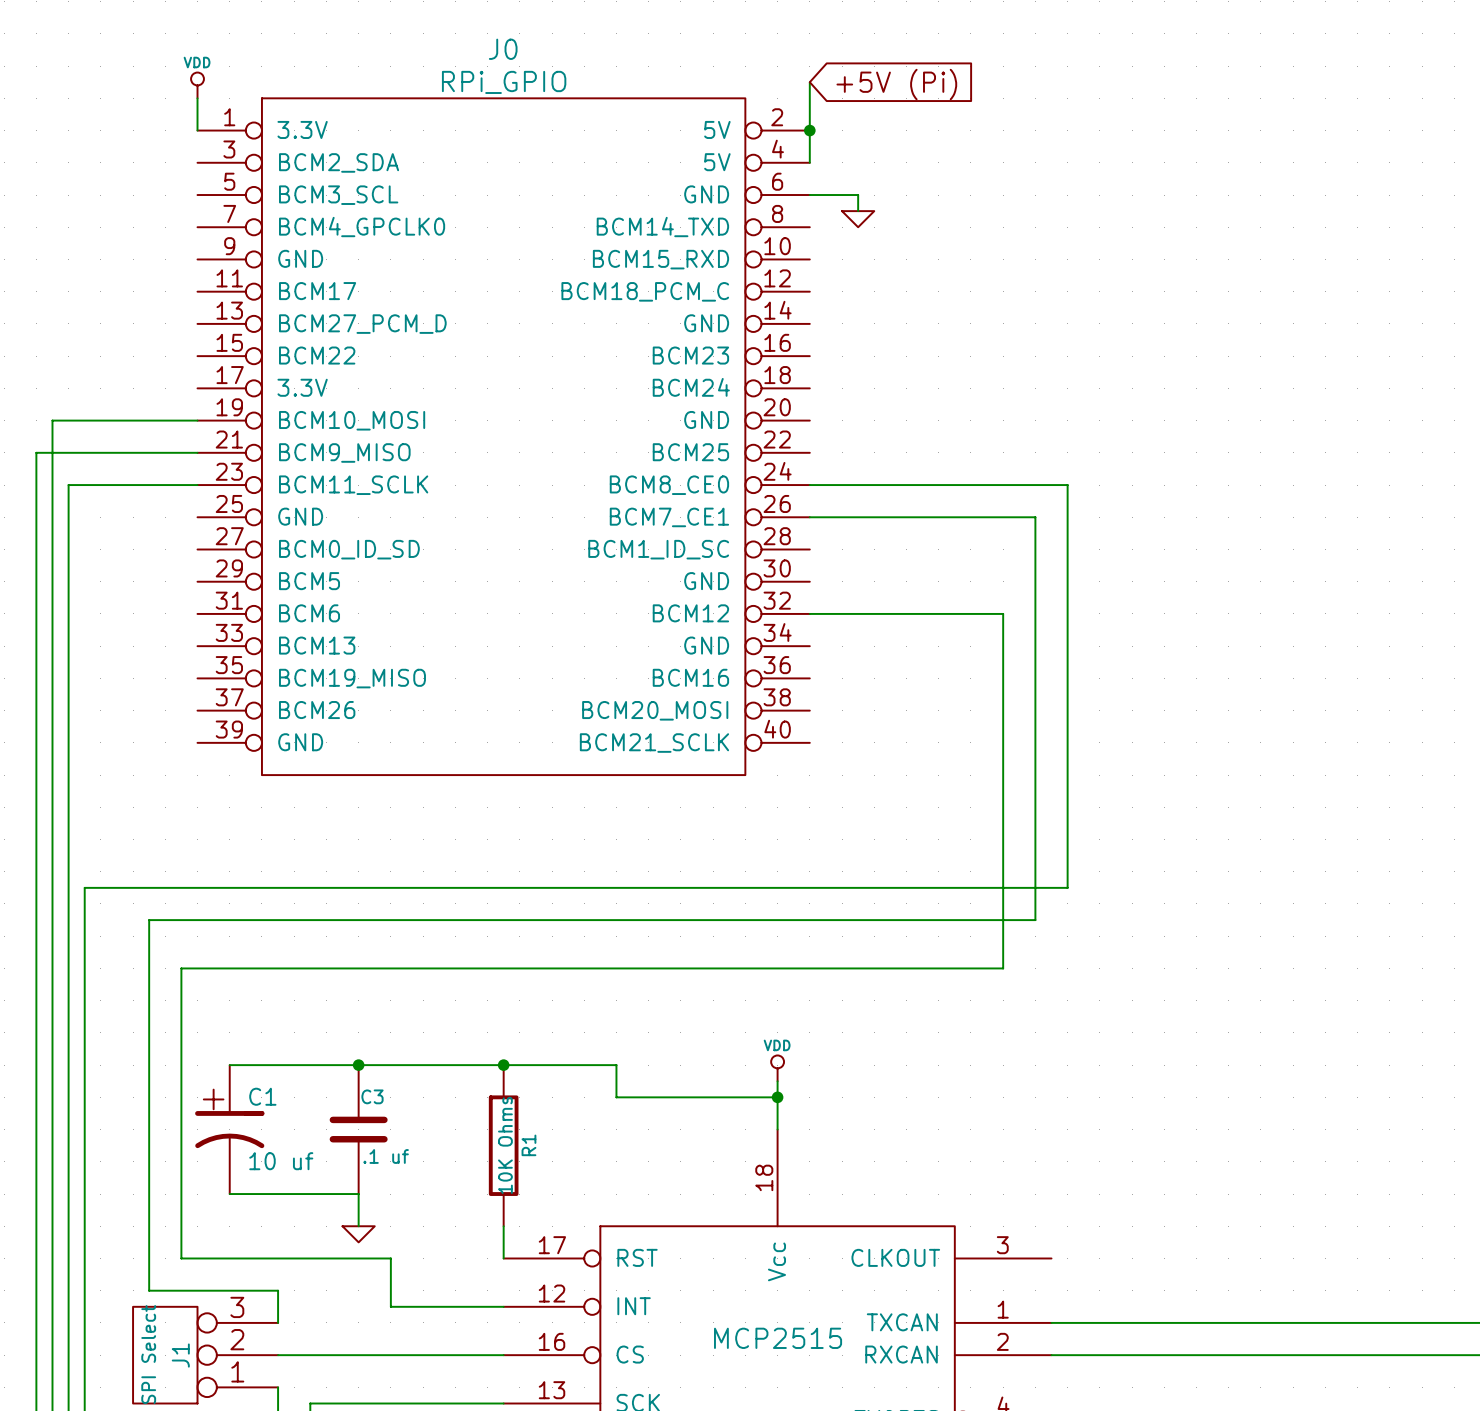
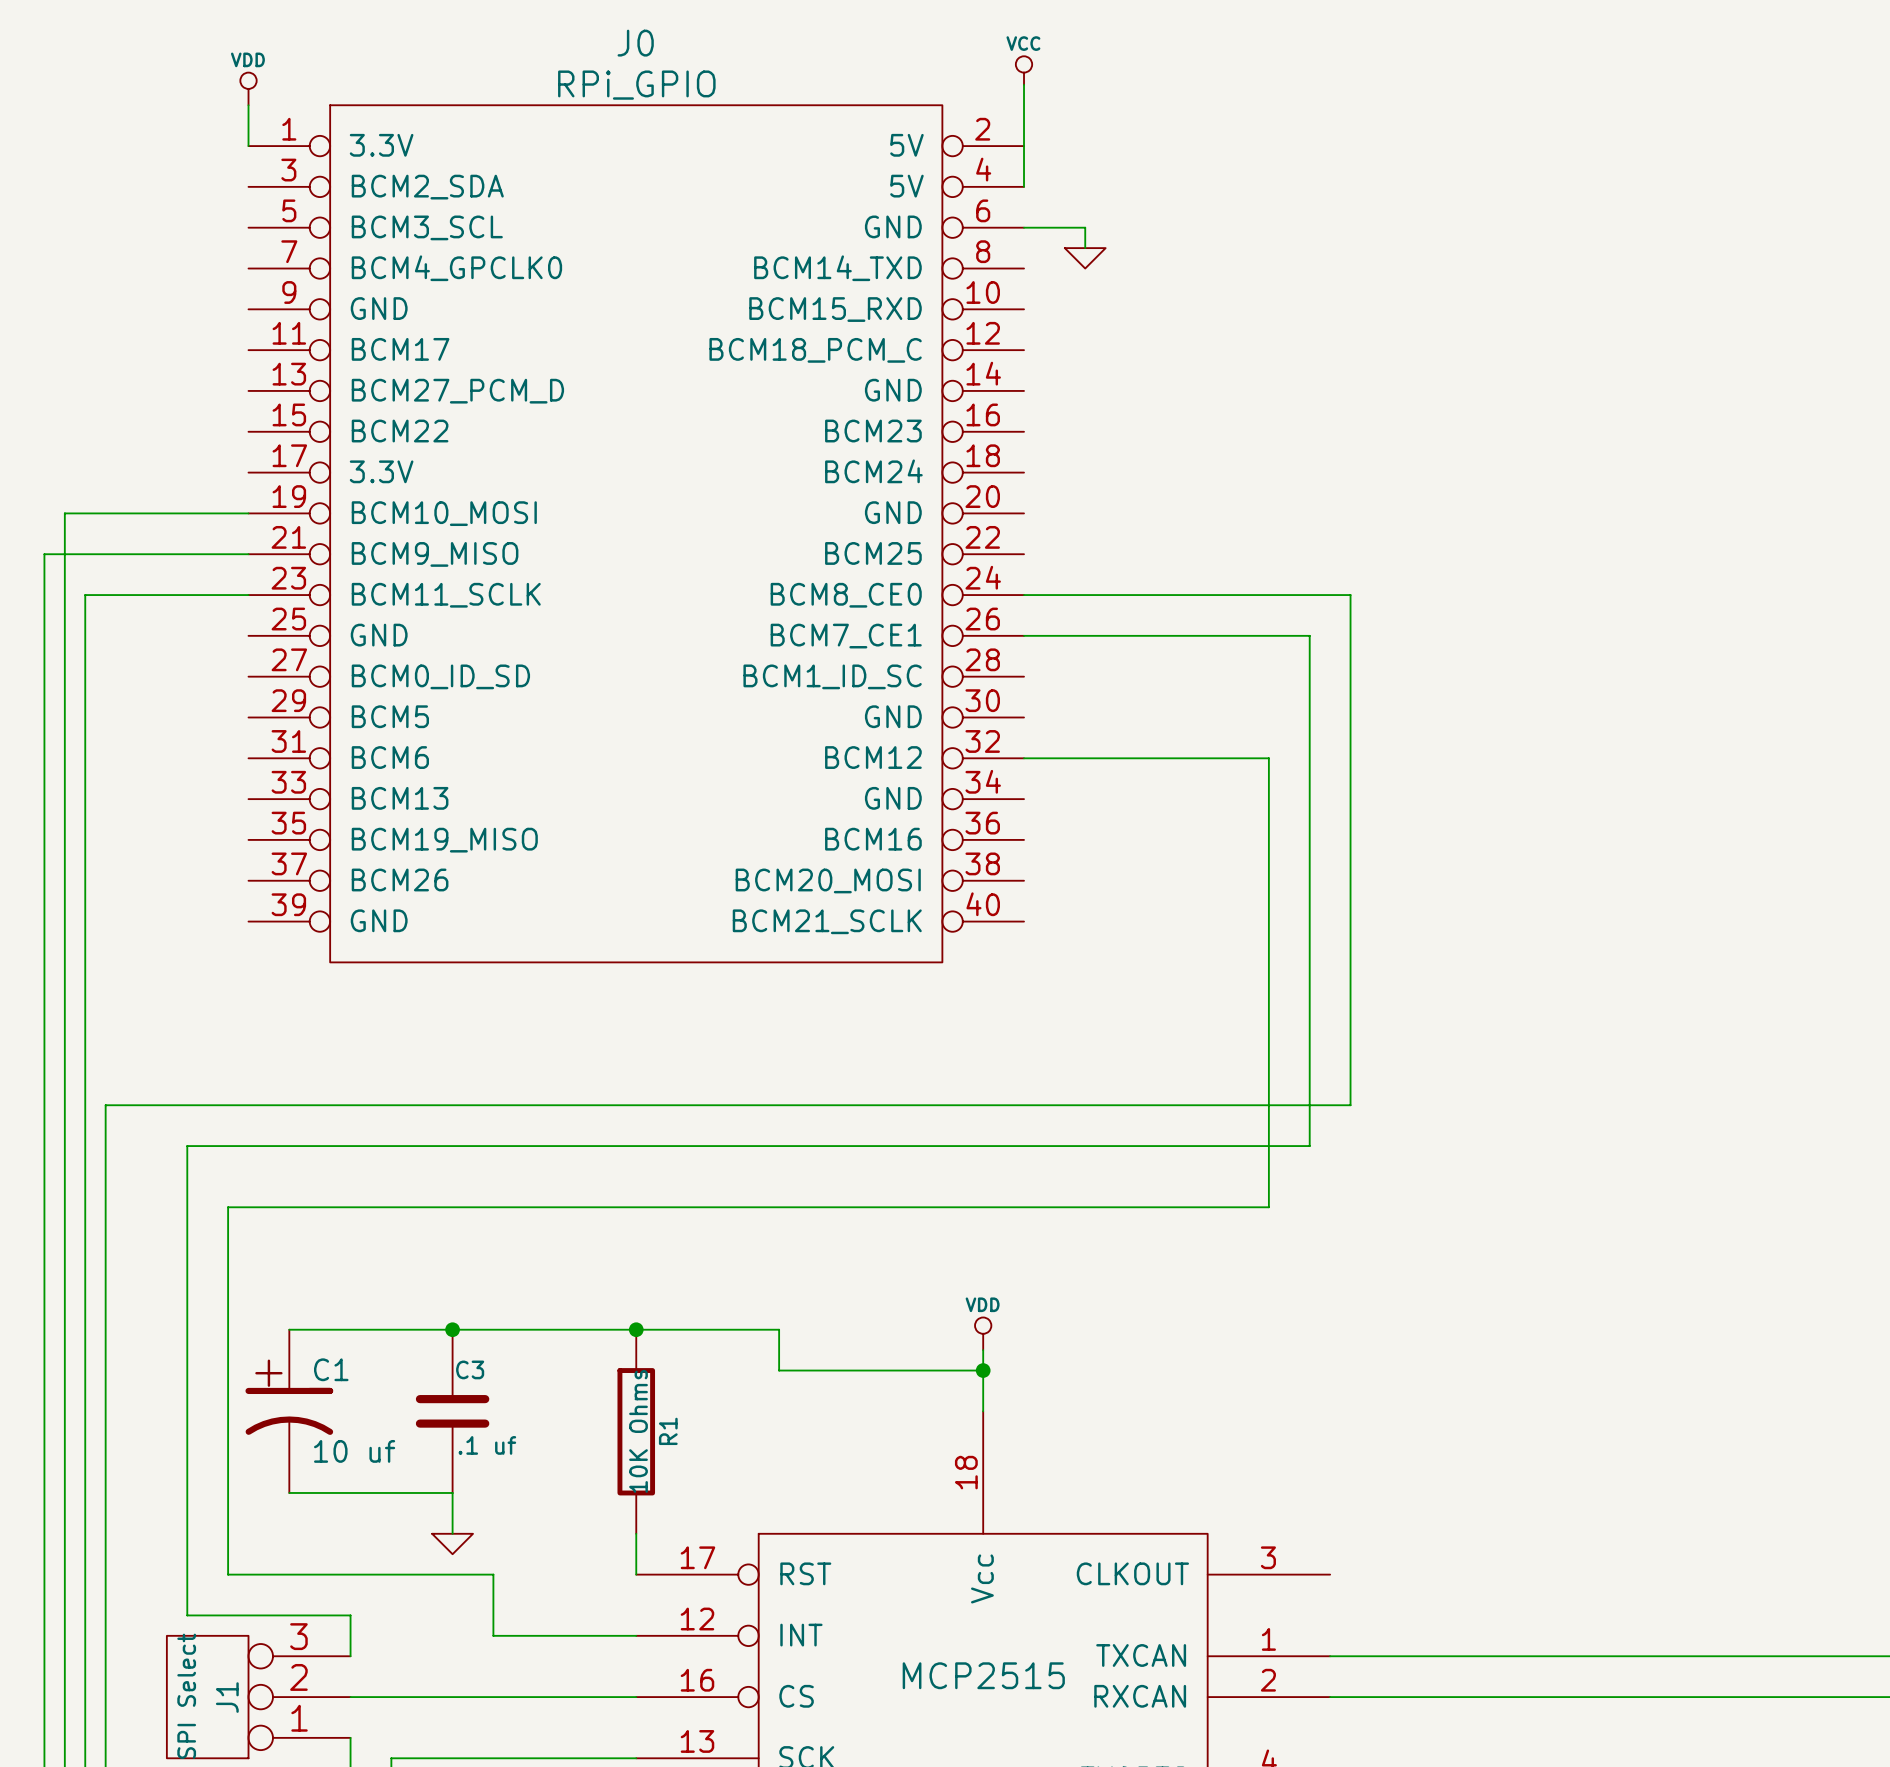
power symbol: none -> VCC (1024, 70)
global label: +5V (Pi) (896, 84) -> none
junction: (809, 130) -> none

